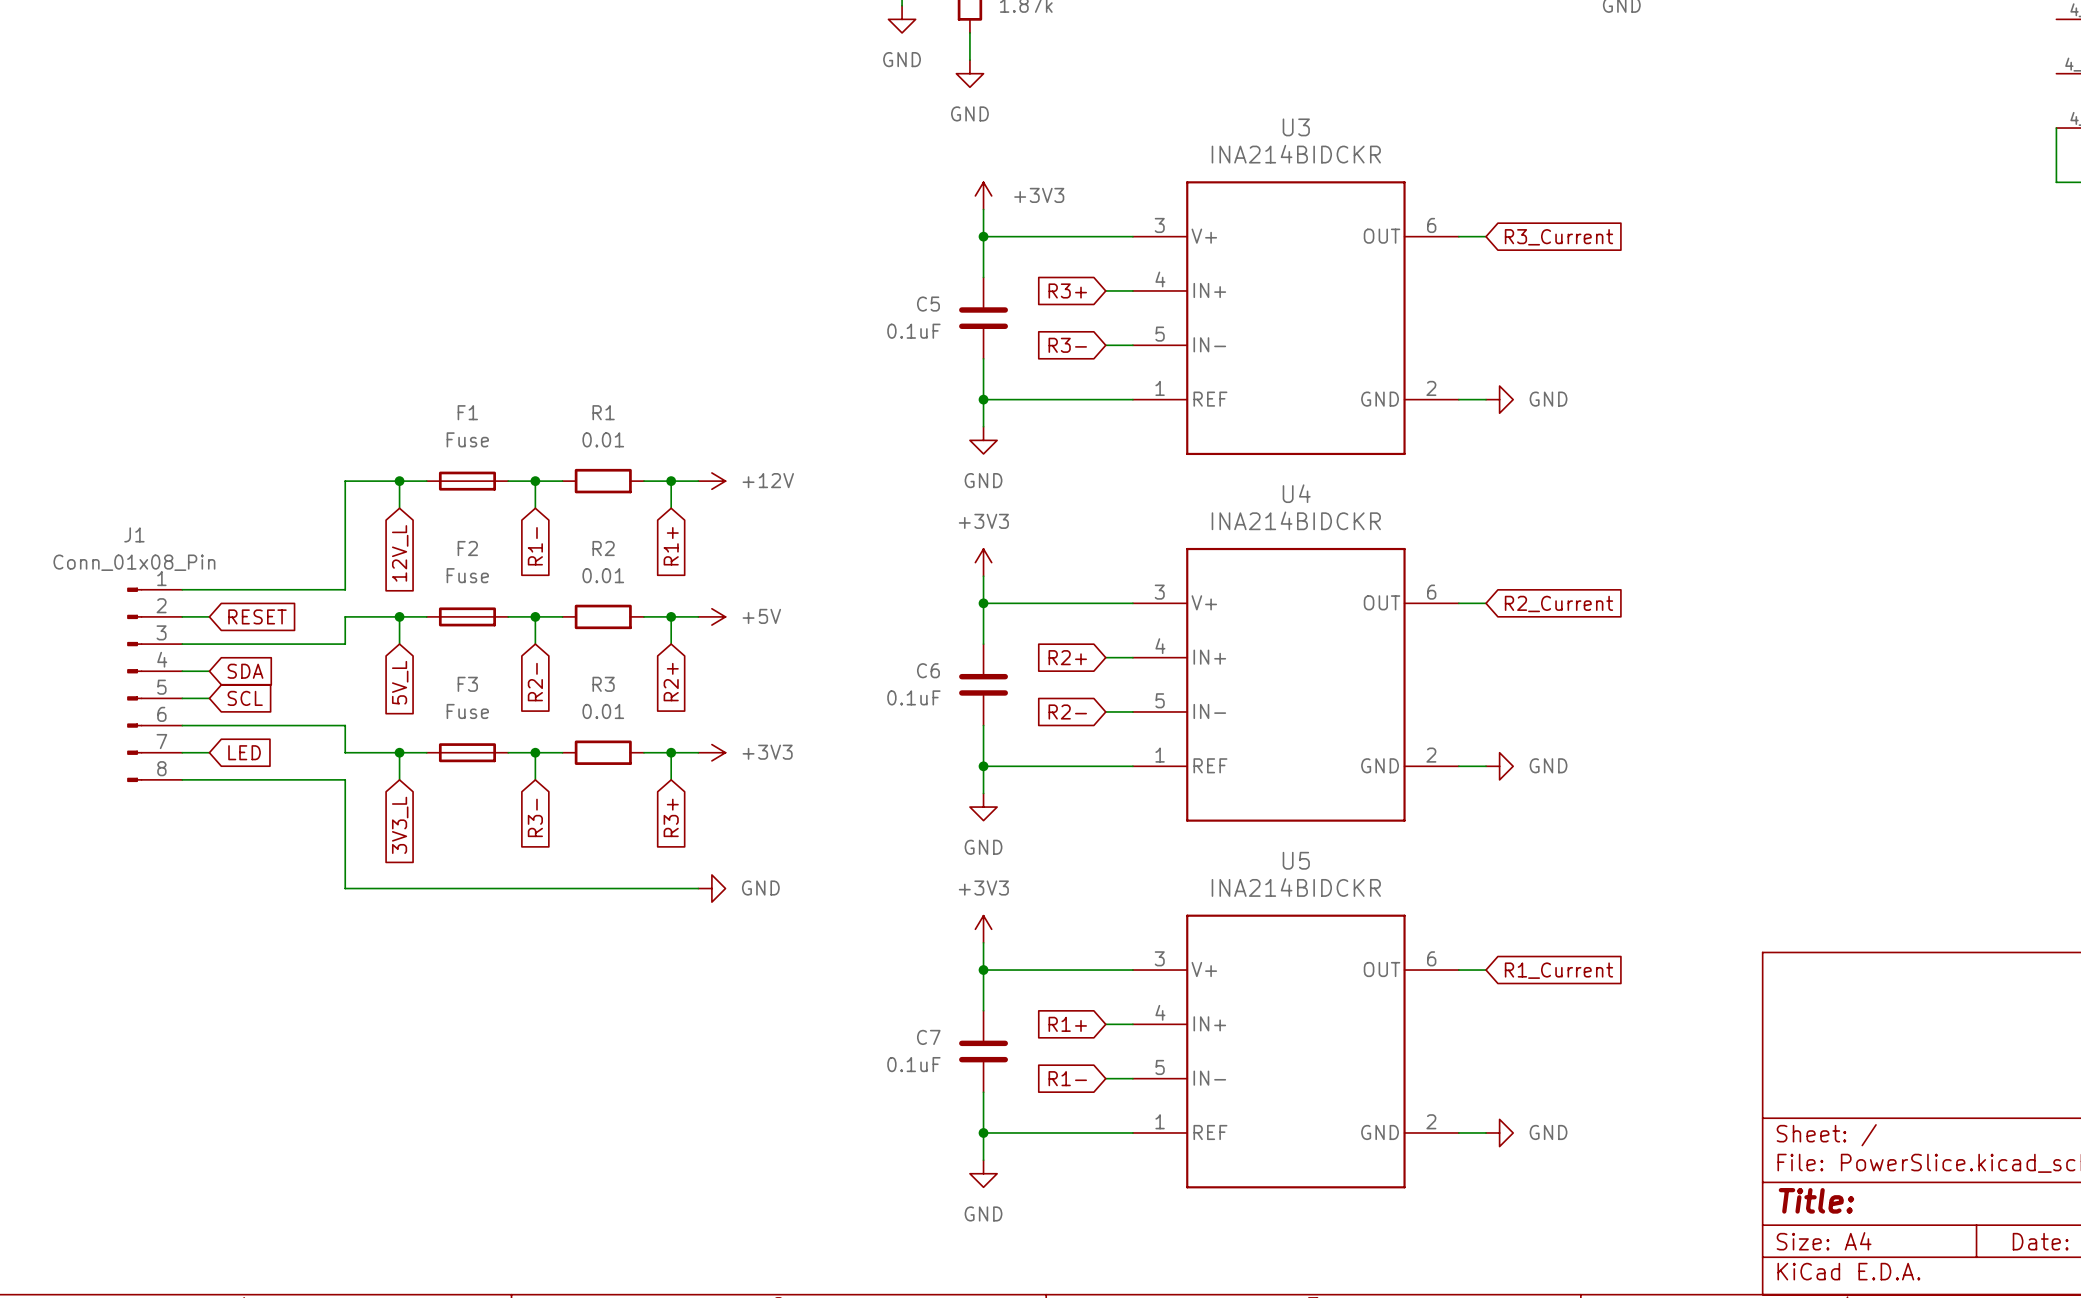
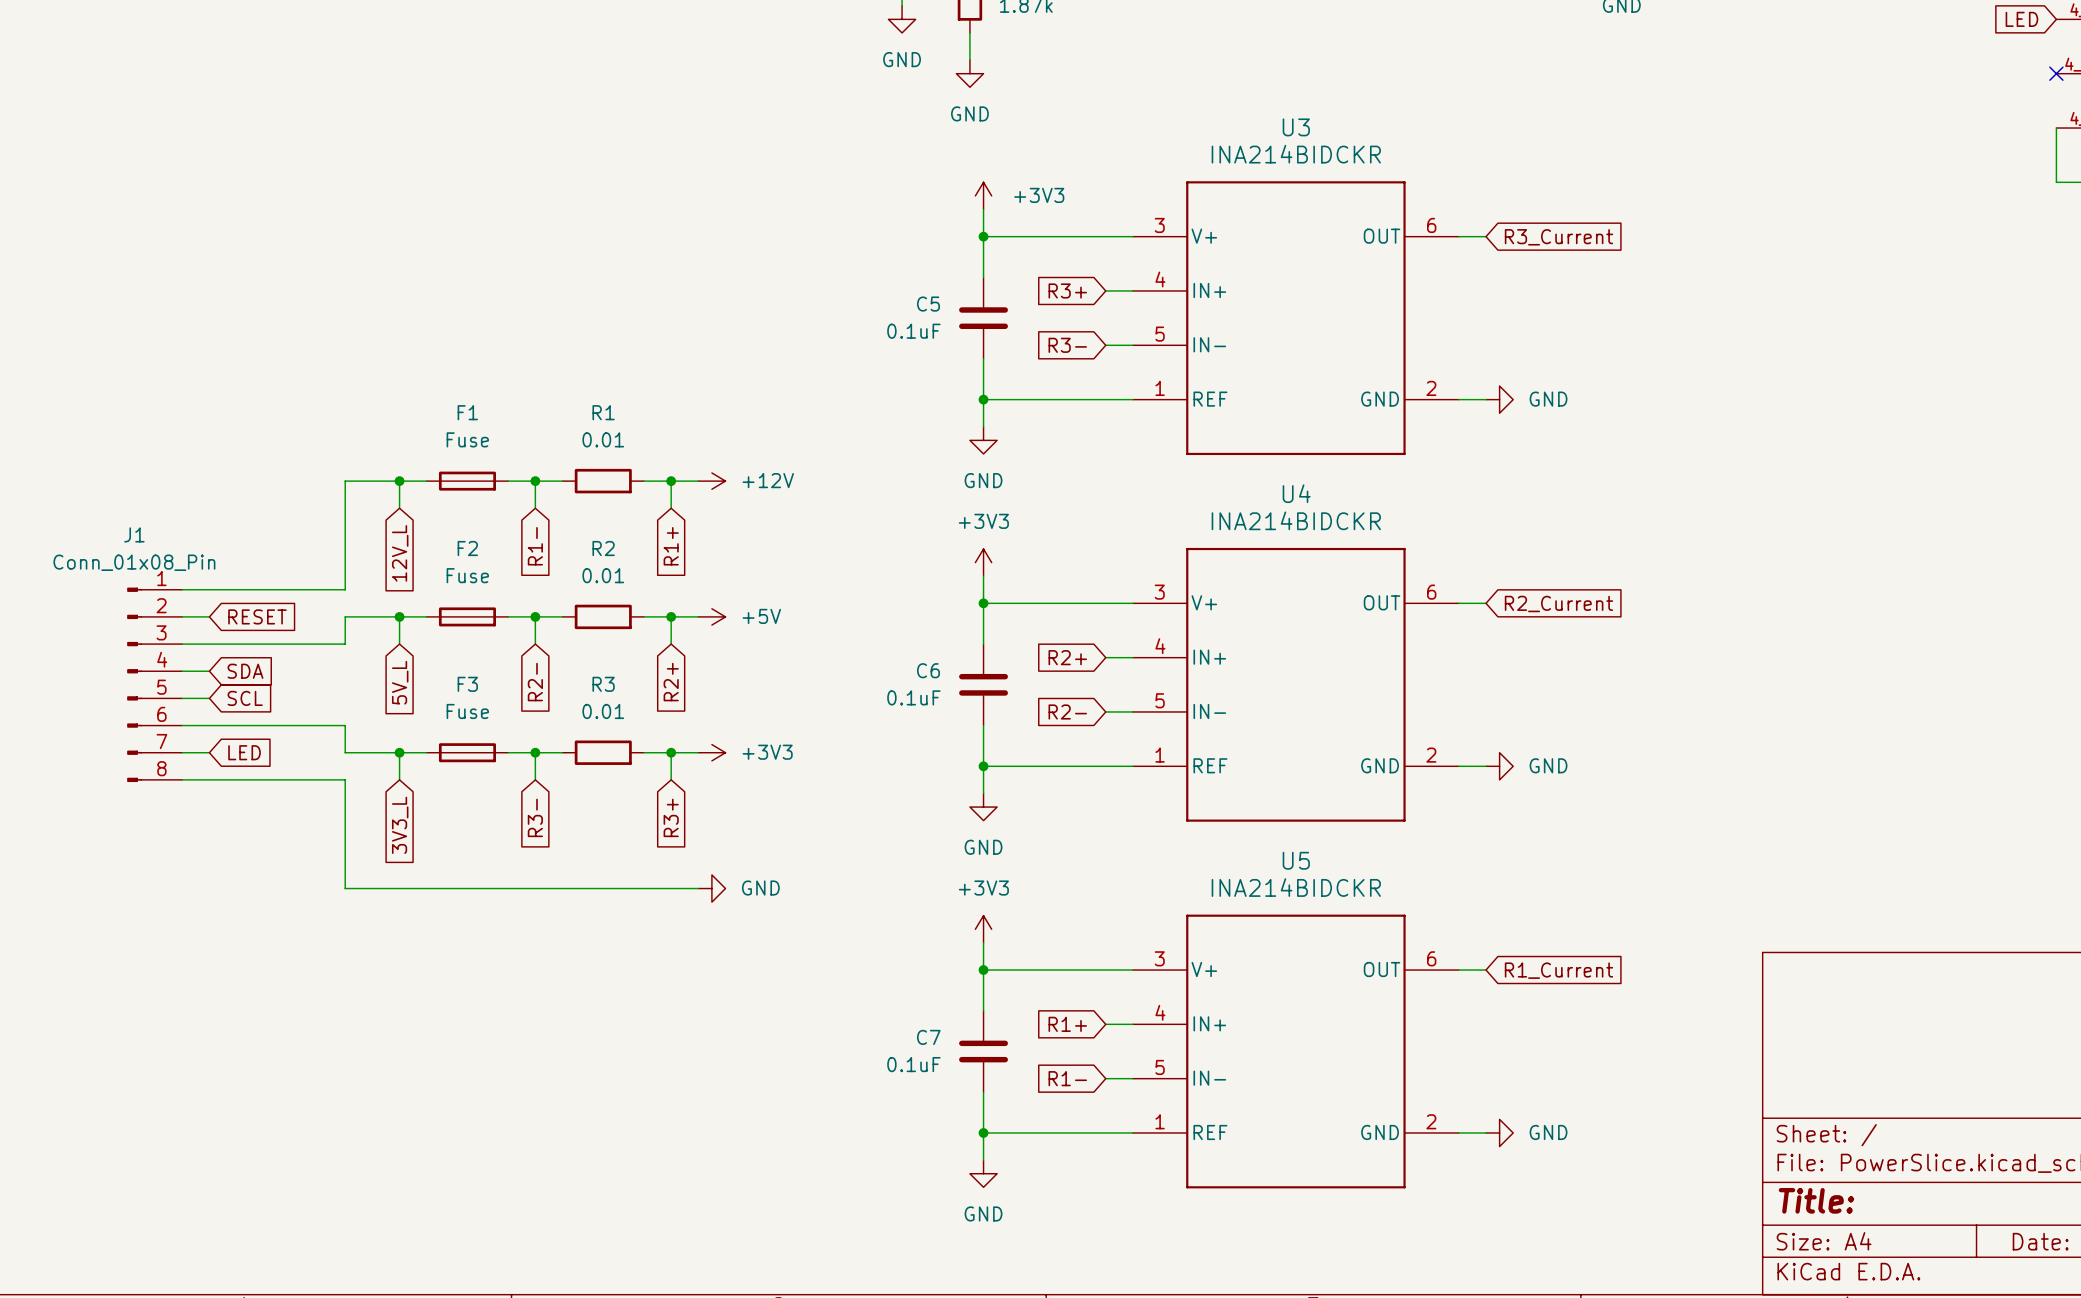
global label: none -> LED (2021, 19)
no-connect mark: none -> (2056, 73)

